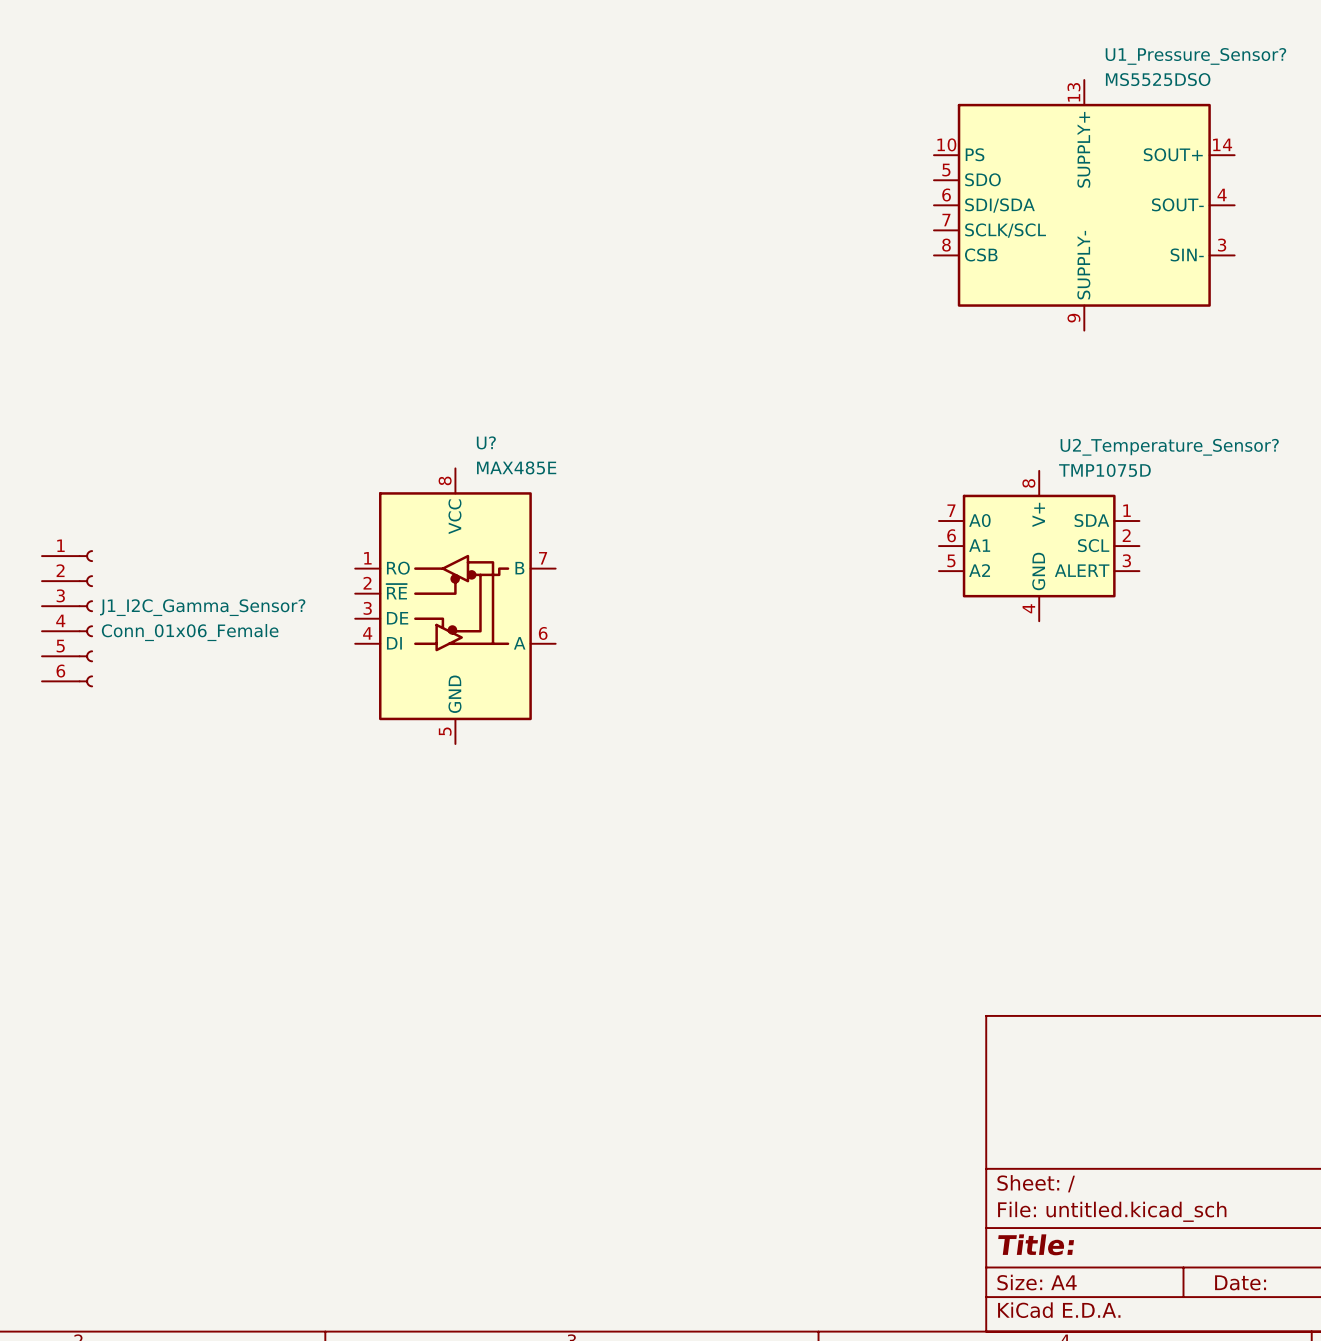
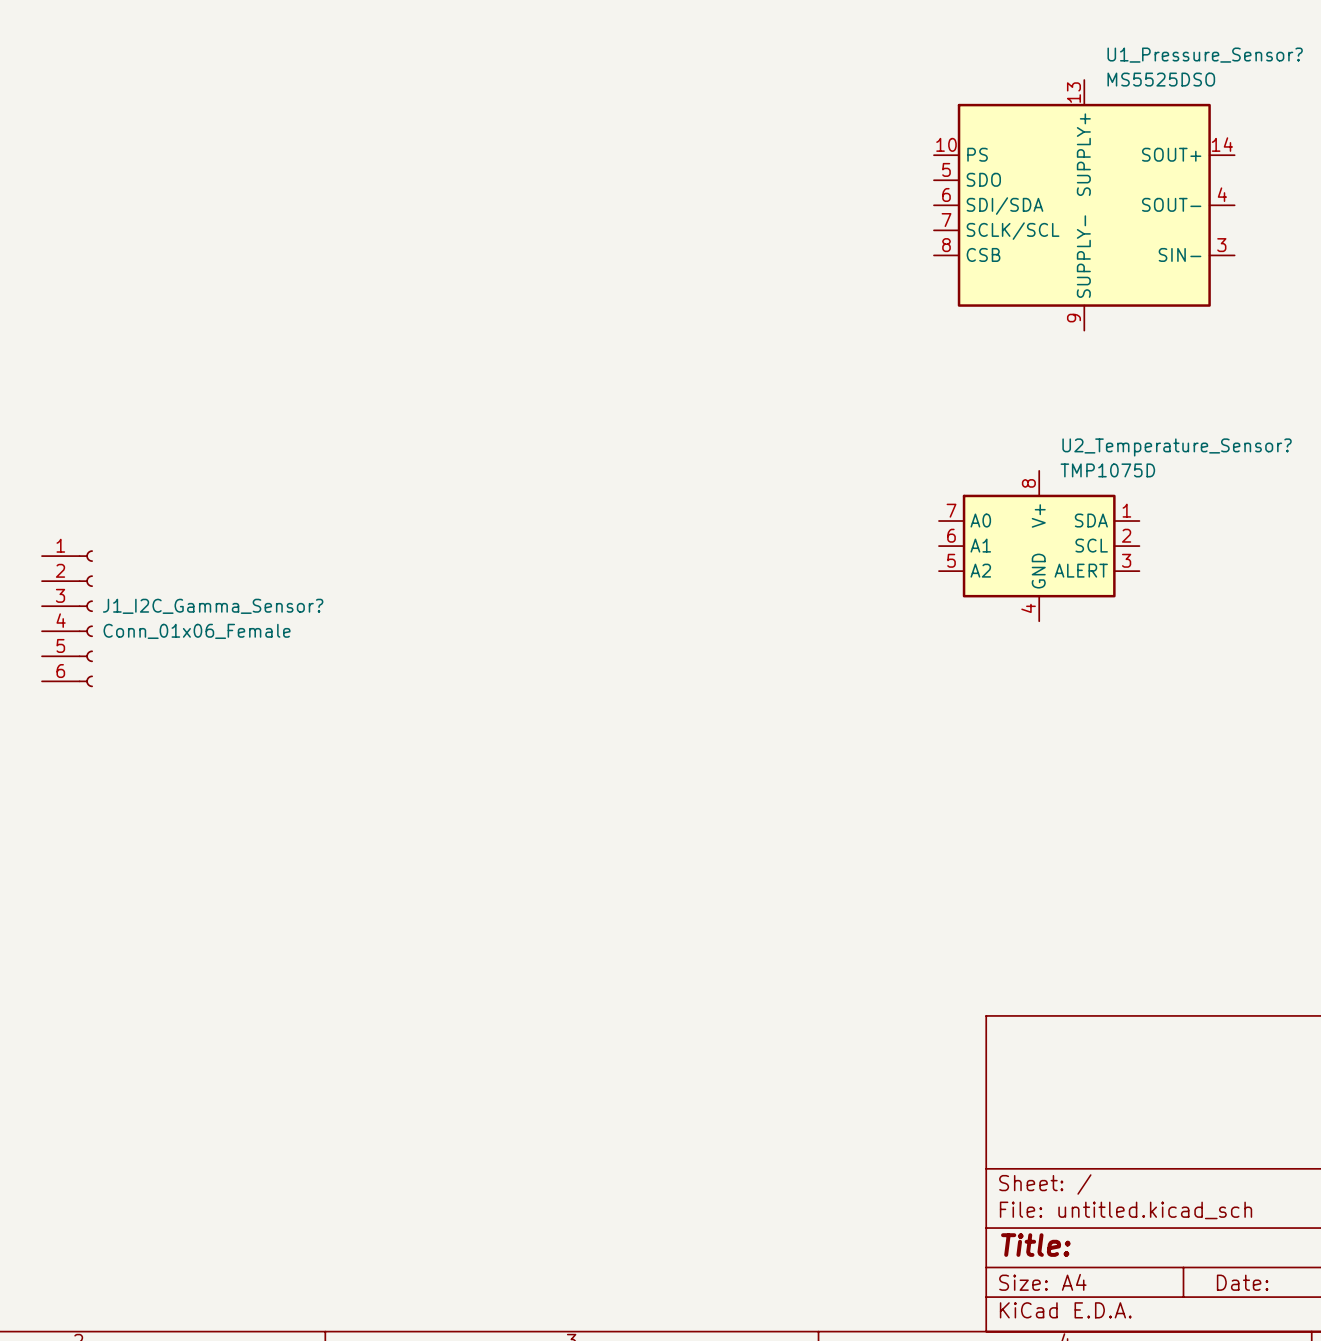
U?: MAX485E (455, 606) -> none

